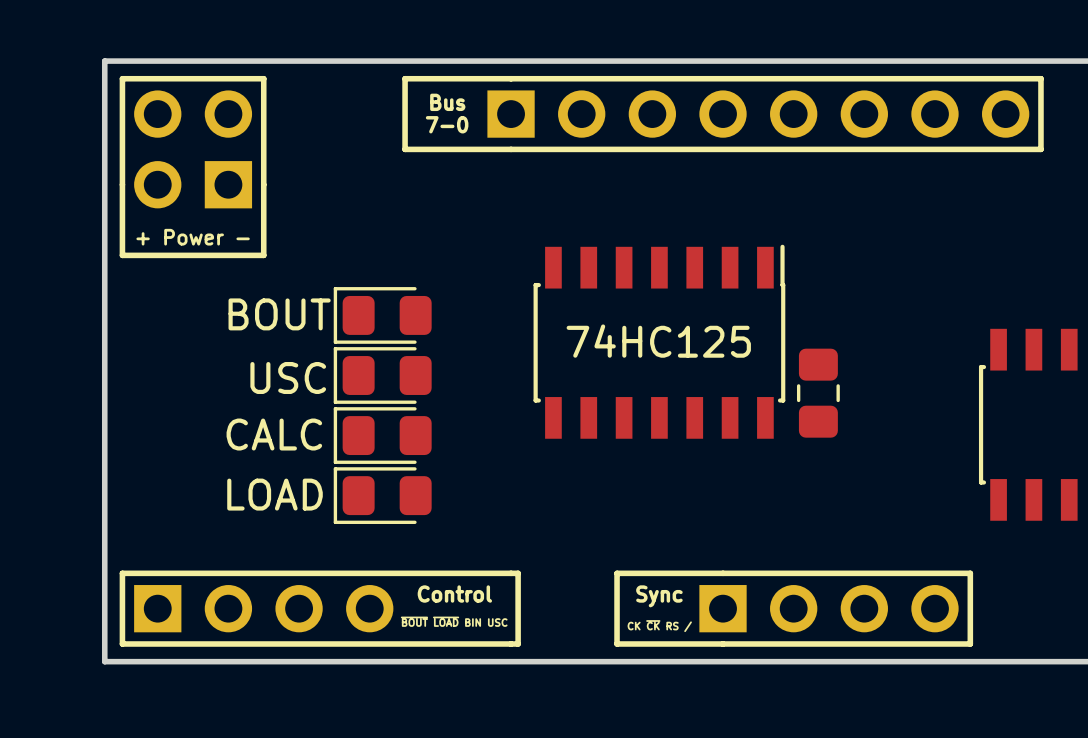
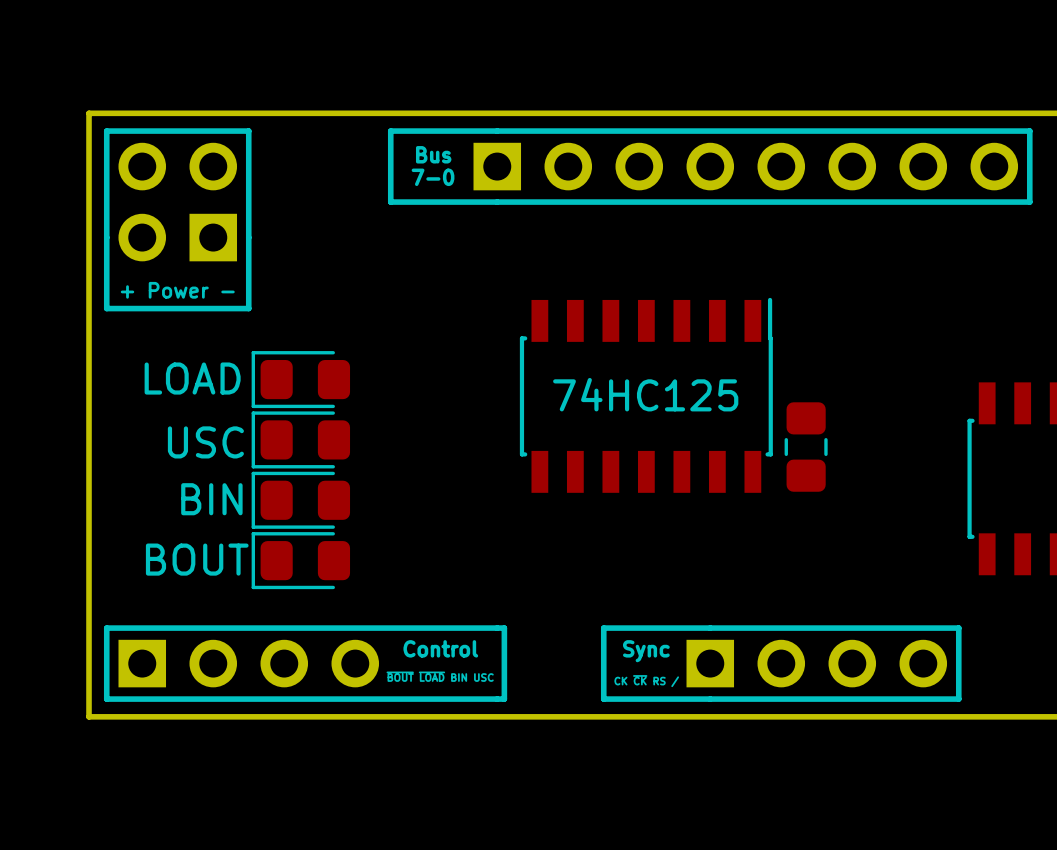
part position: (382, 315) -> (300, 560)
part position: (382, 375) -> (300, 439)
part: CALC (382, 435) -> none
part: none -> BIN (300, 500)
part position: (382, 495) -> (300, 379)

